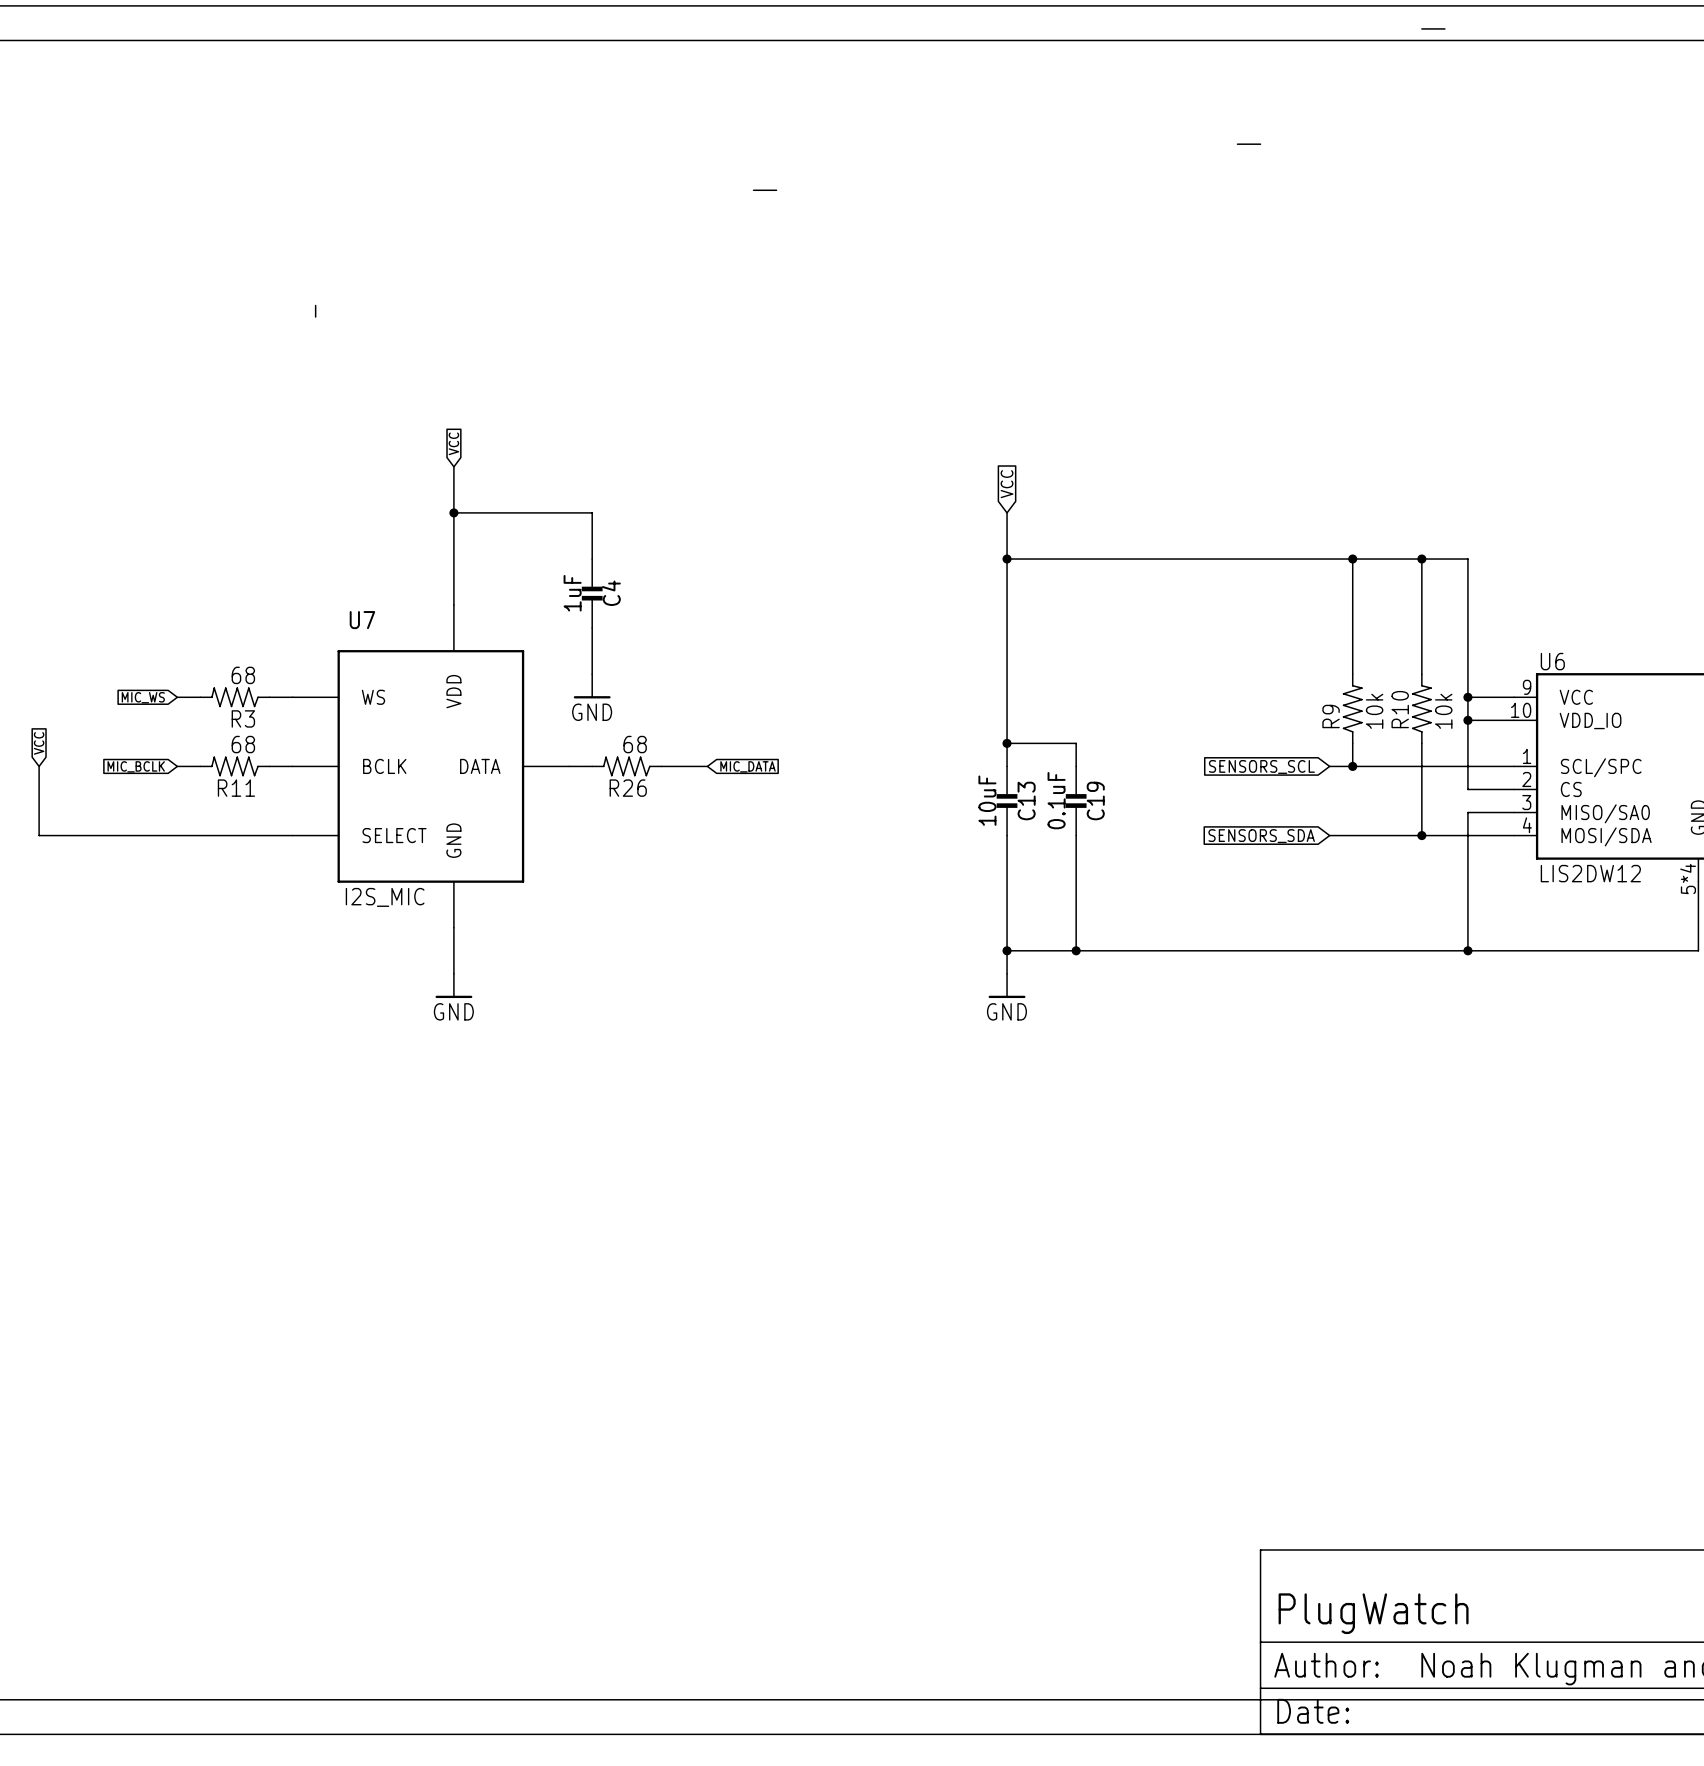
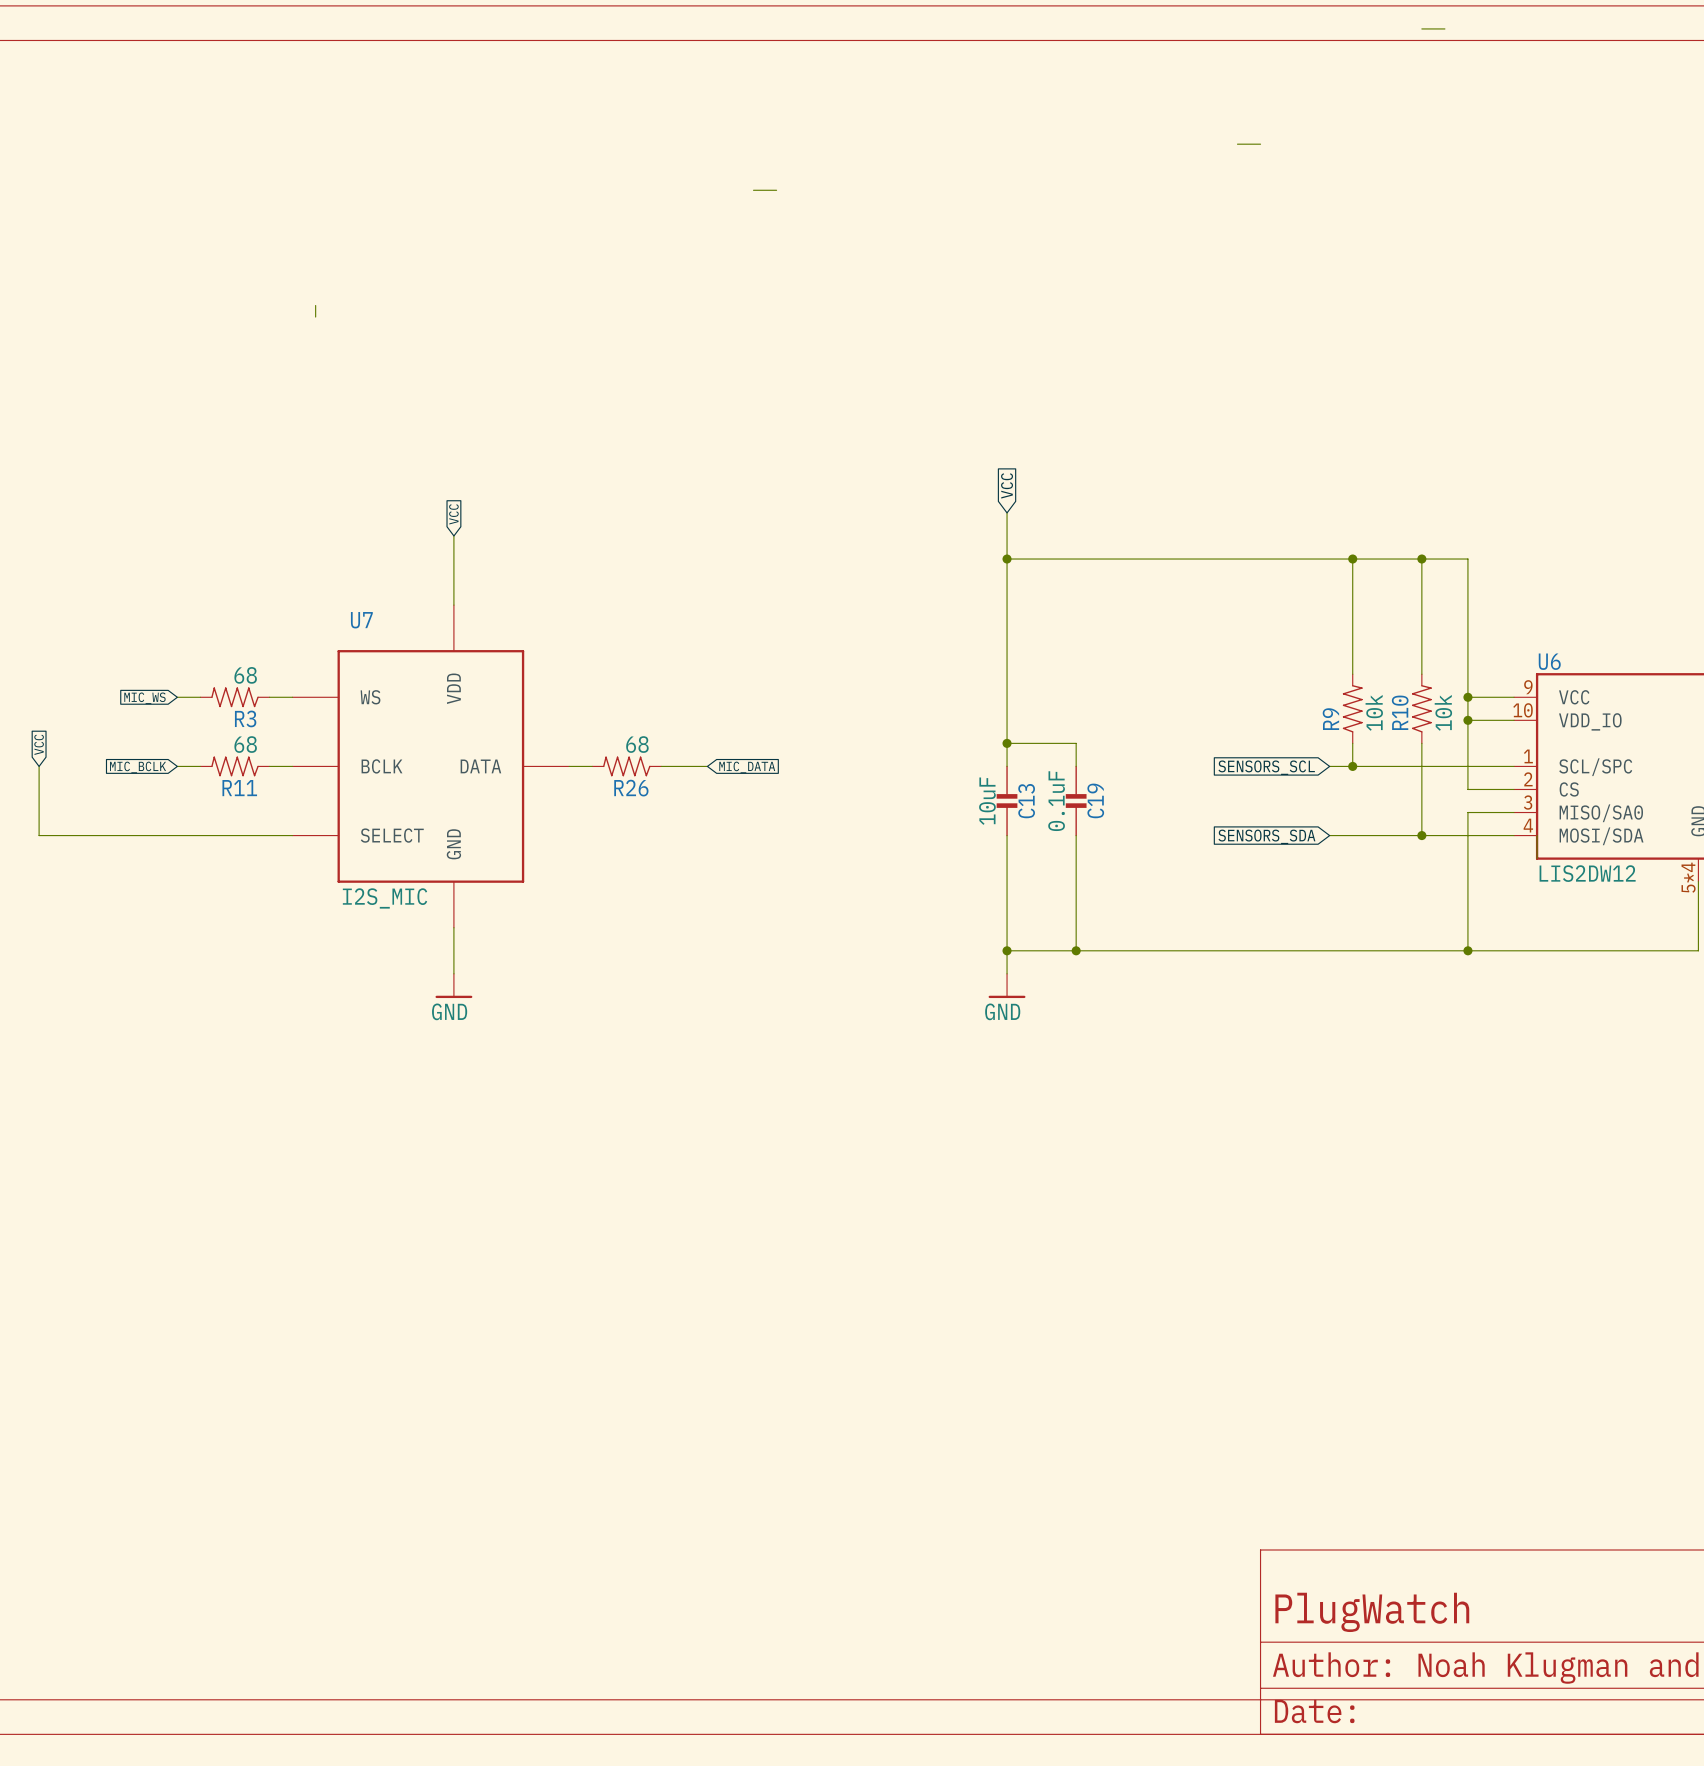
global label position: VCC (453, 443) -> VCC (453, 514)
wire: (453, 466) (453, 535) -> none
wire: (453, 512) (592, 512) (592, 559) -> none
junction: (453, 512) -> none
C4: 1uF (592, 593) -> none
wire: (592, 628) (592, 674) -> none
power symbol: GND (592, 686) -> none

